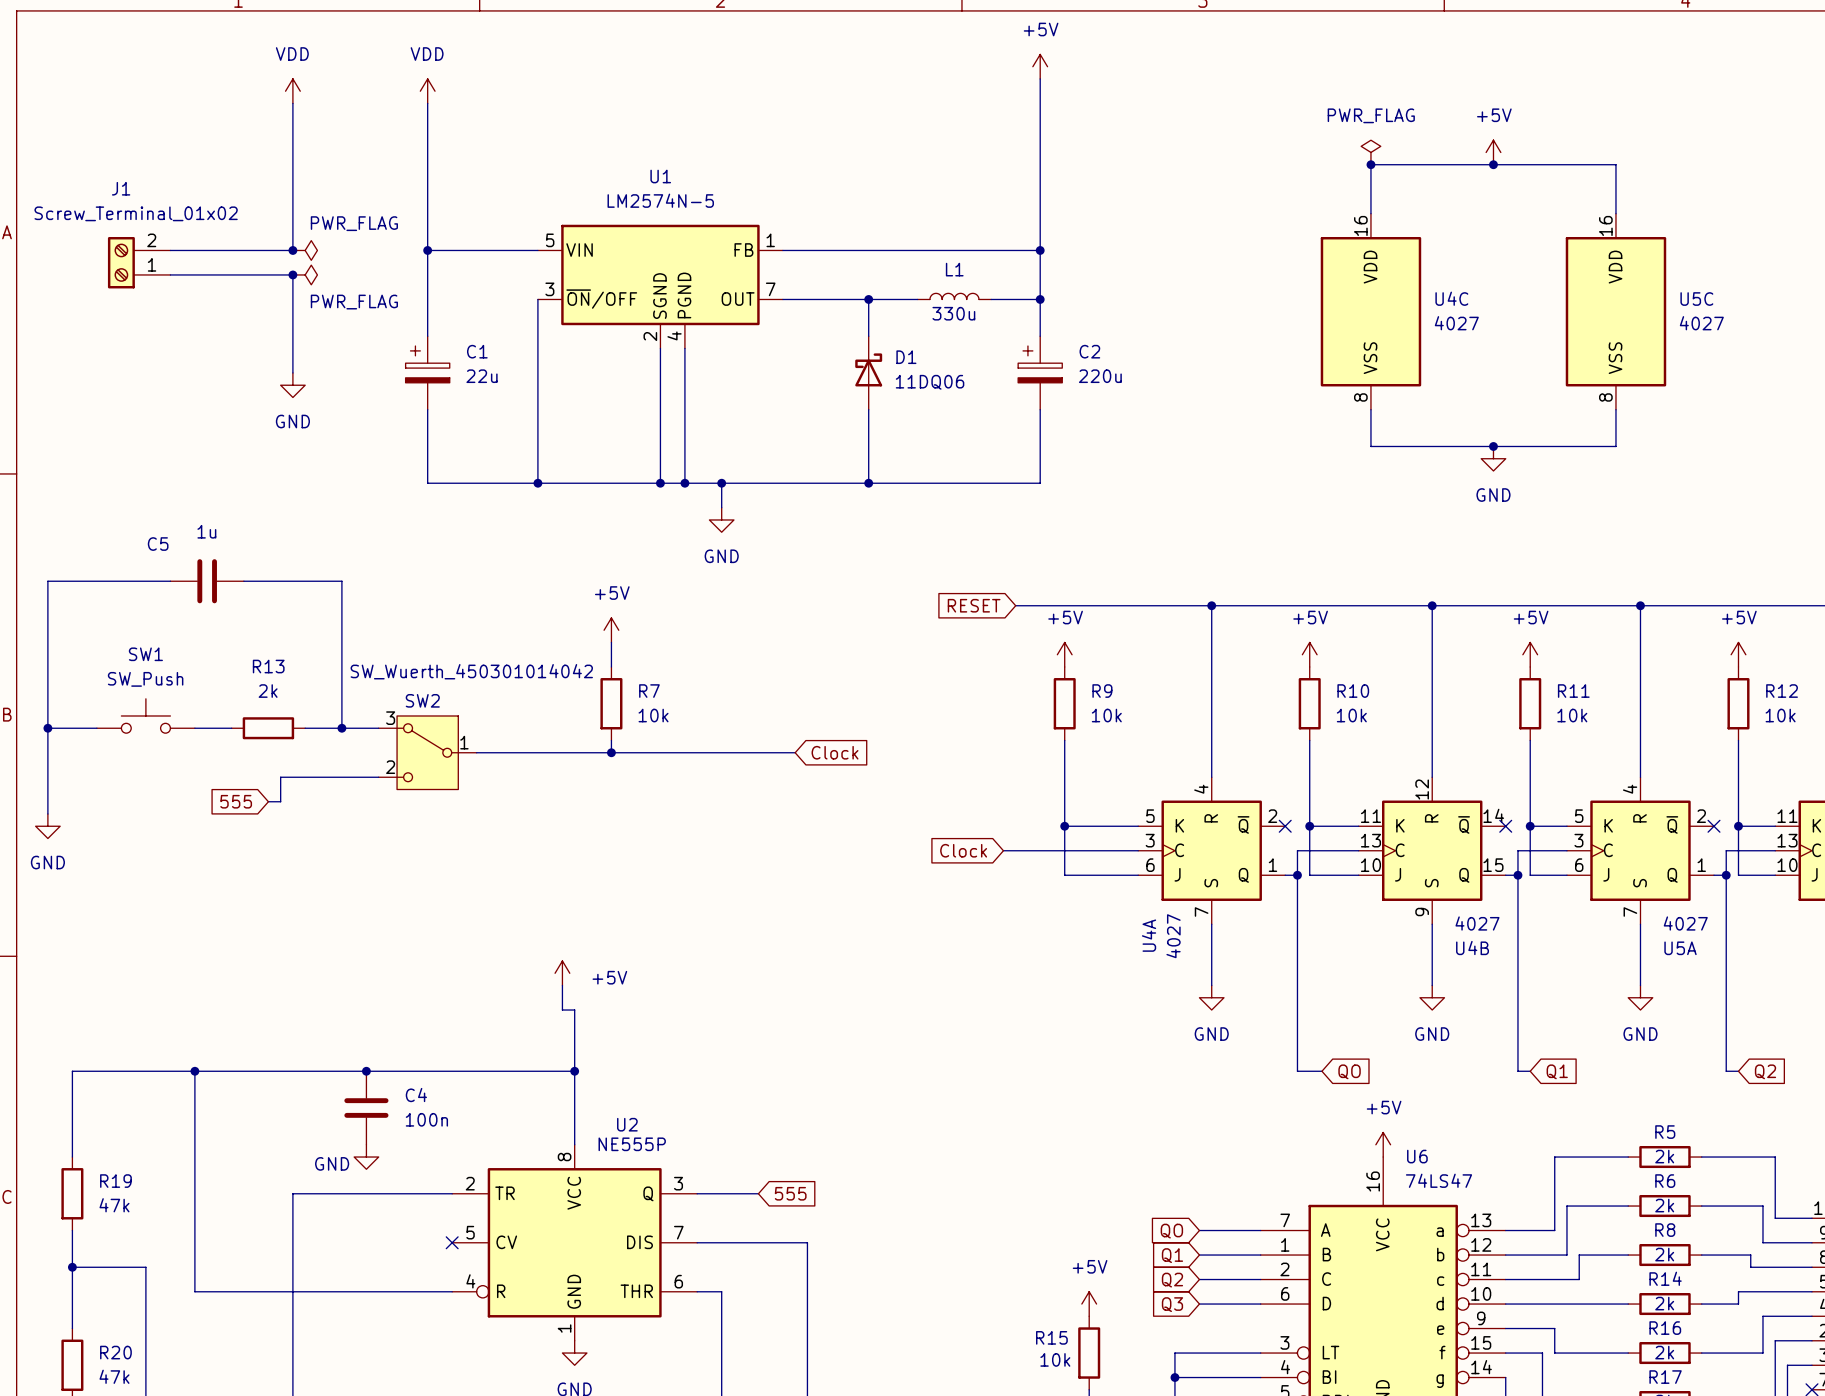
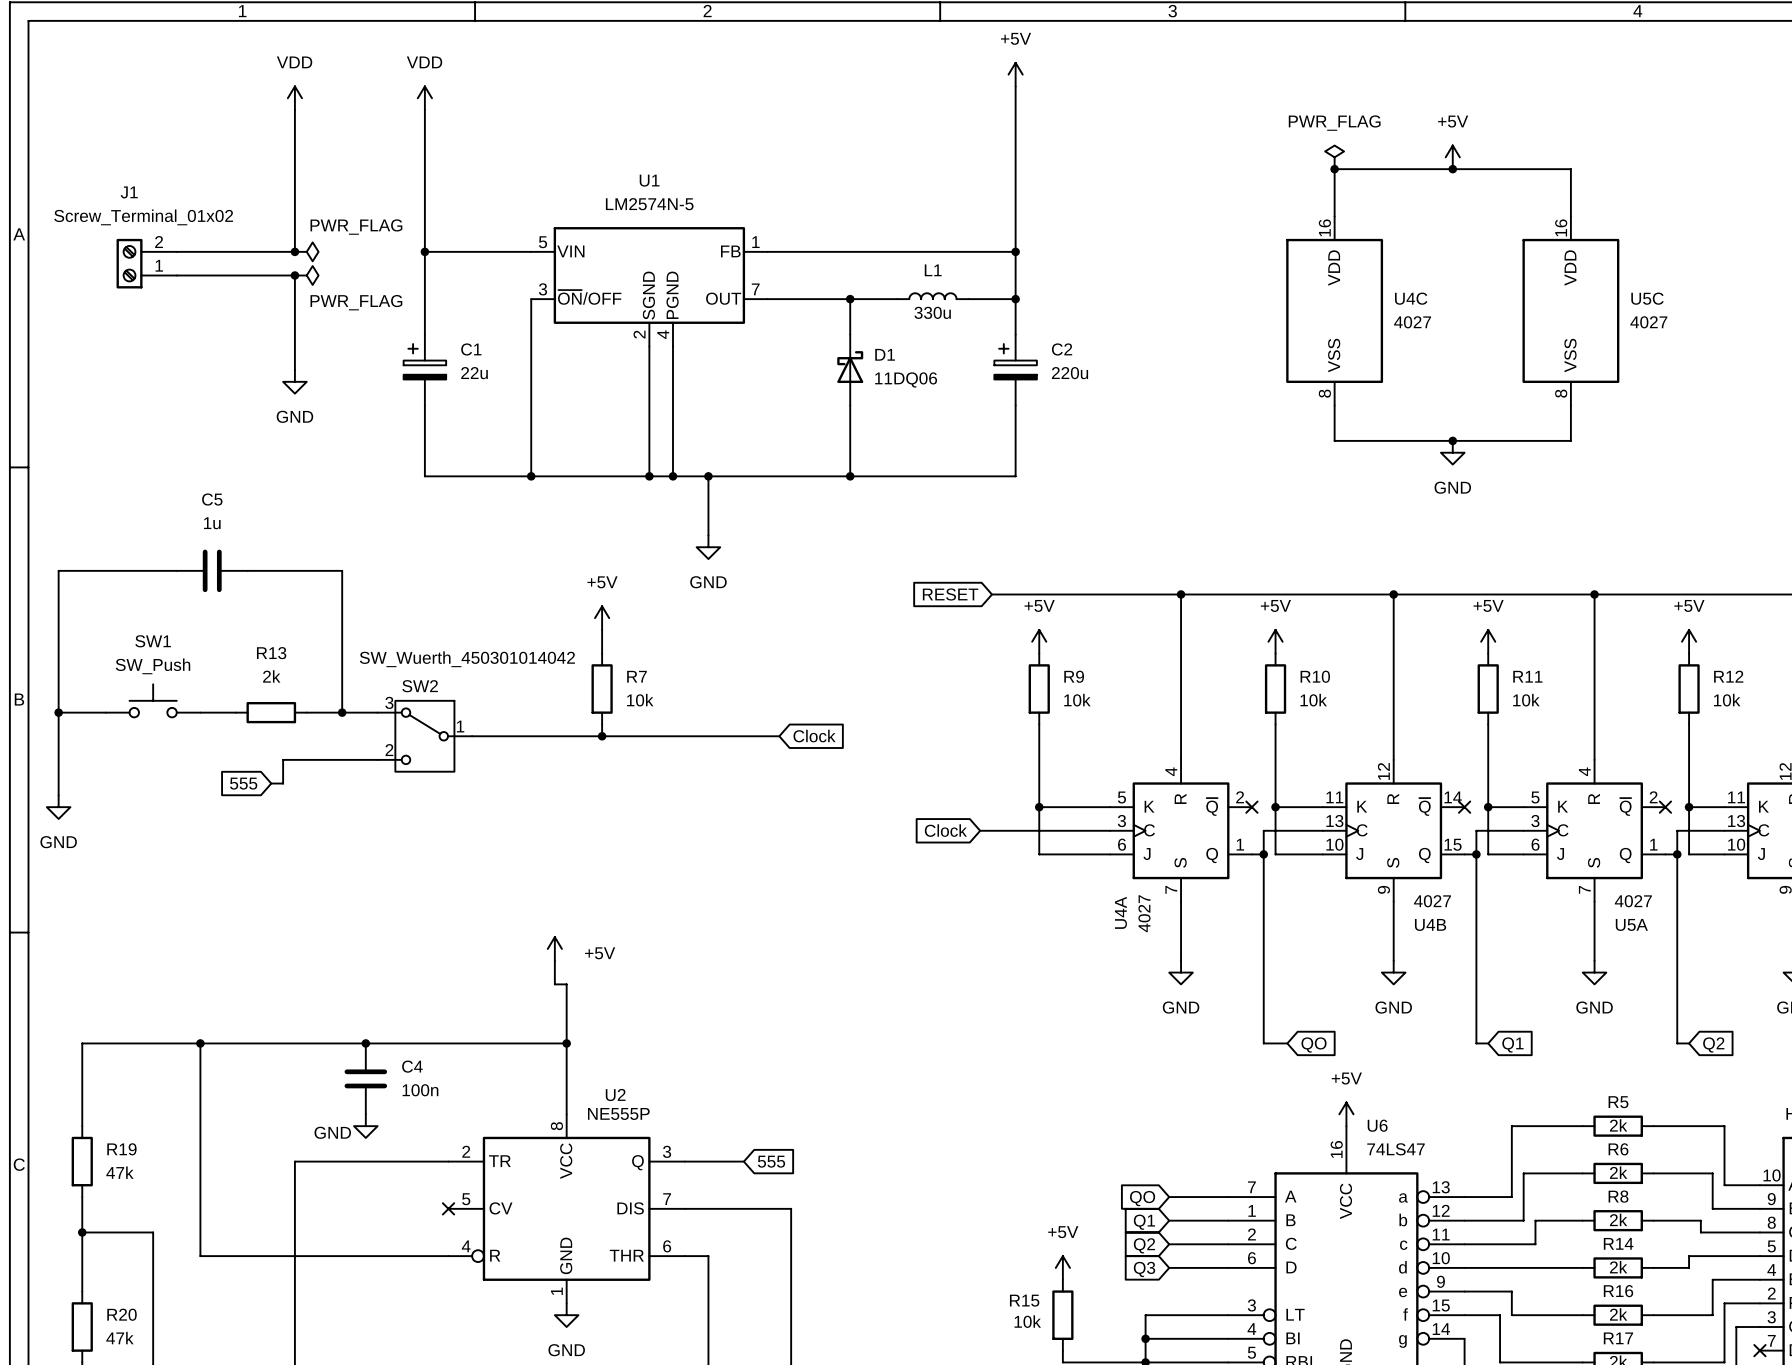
wire: none -> (708, 499) (708, 535)
power symbol position: GND (721, 519) -> GND (708, 547)
C5 name position: C5 (158, 544) -> C5 (212, 499)

